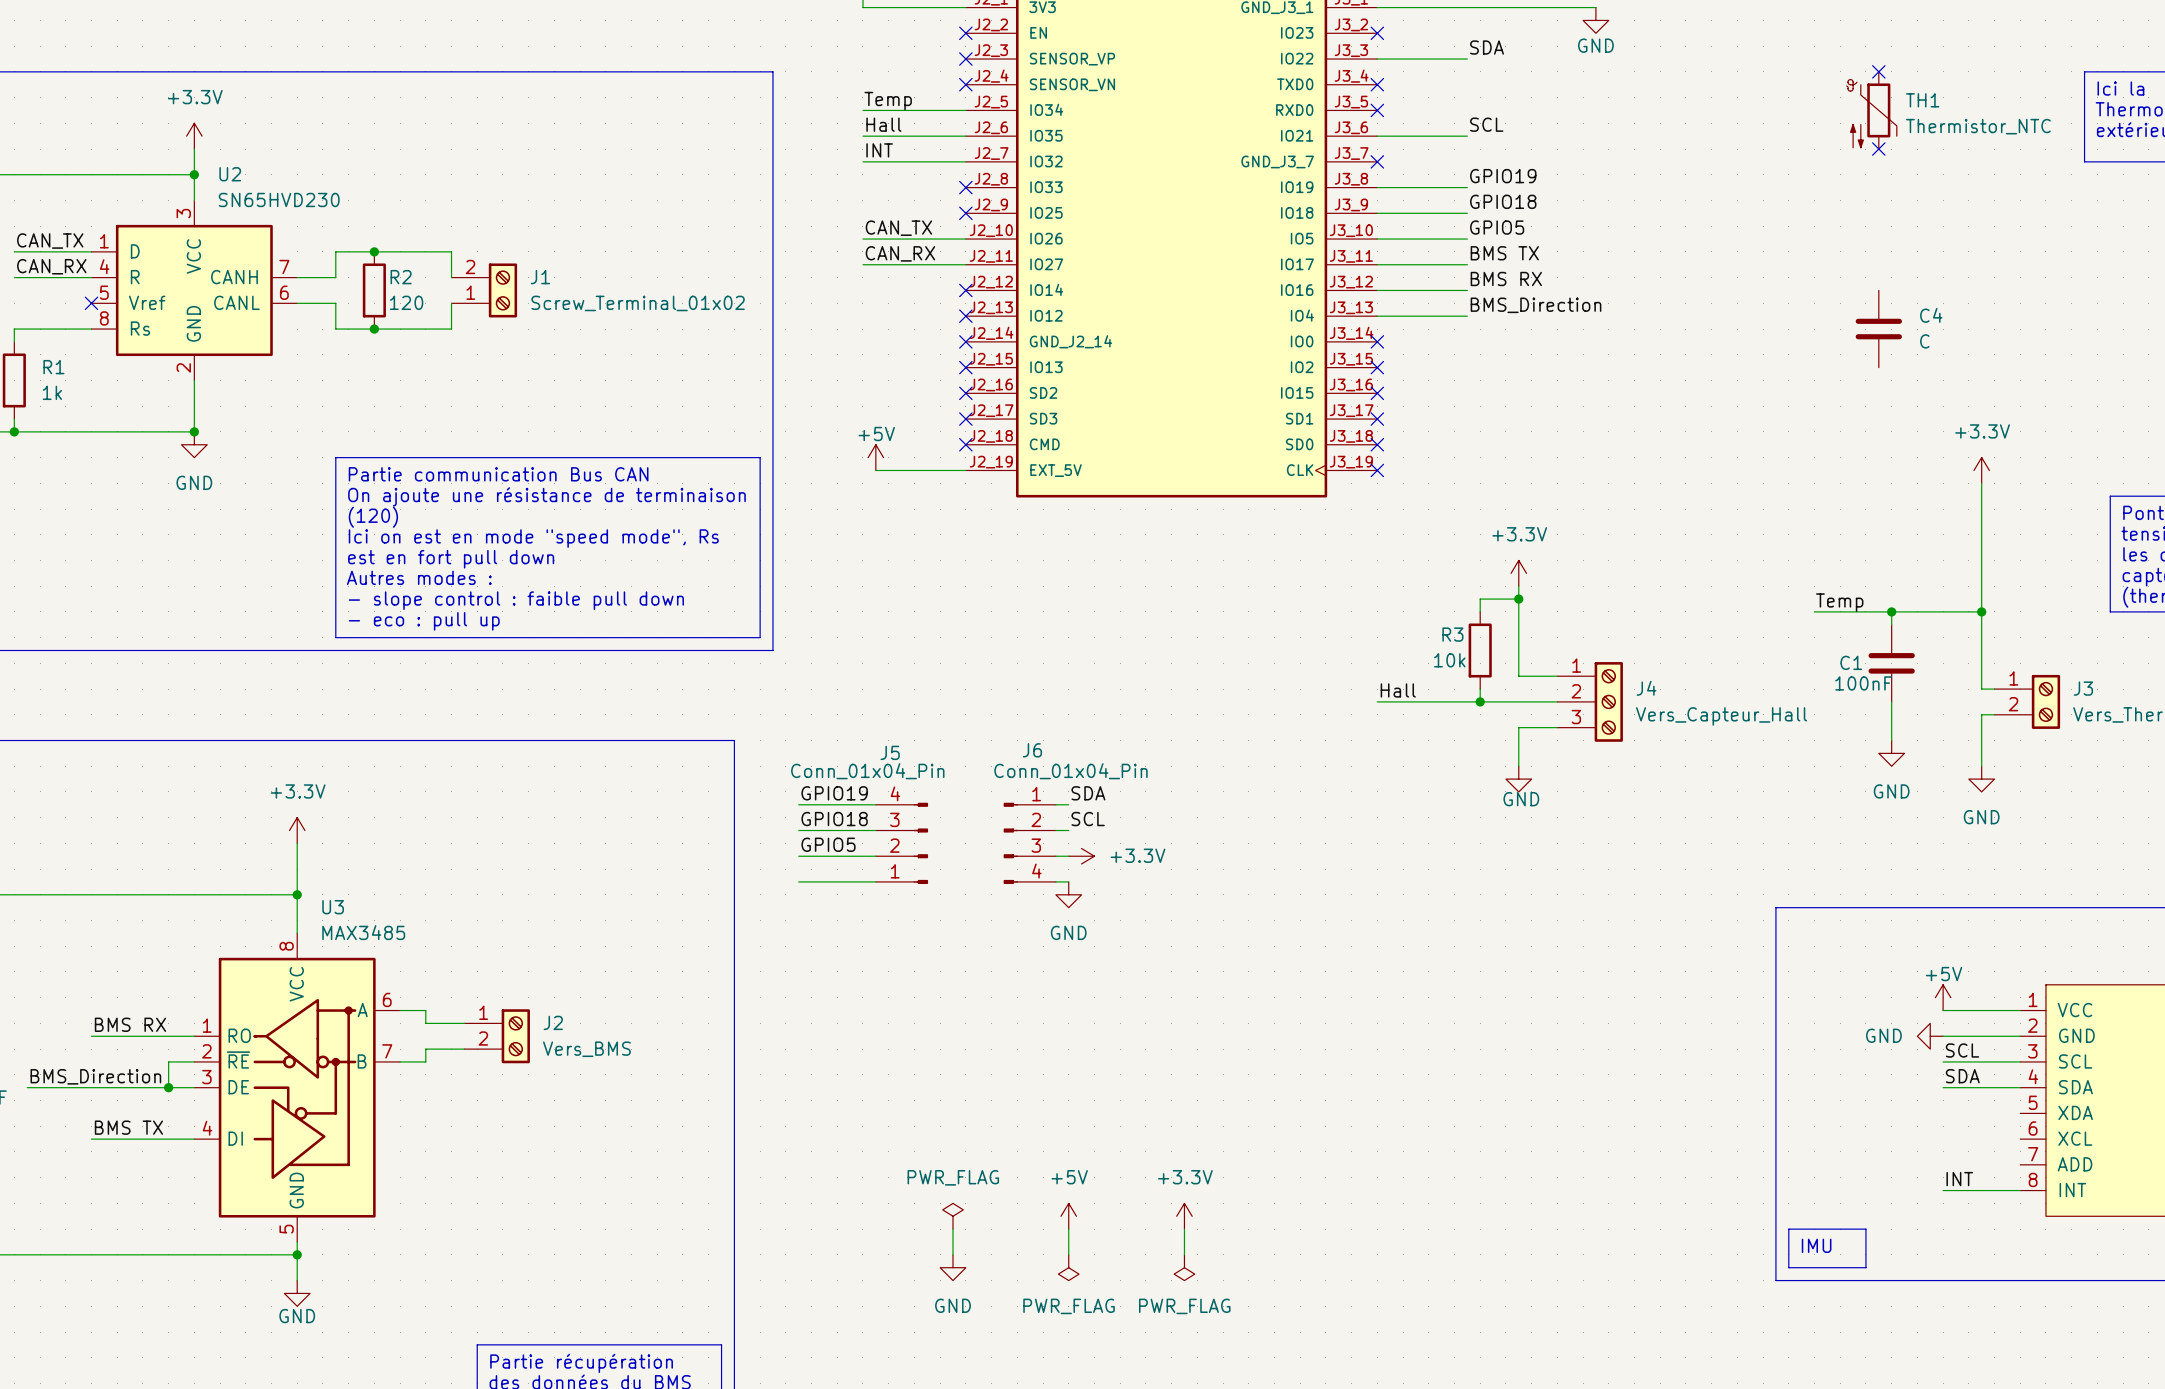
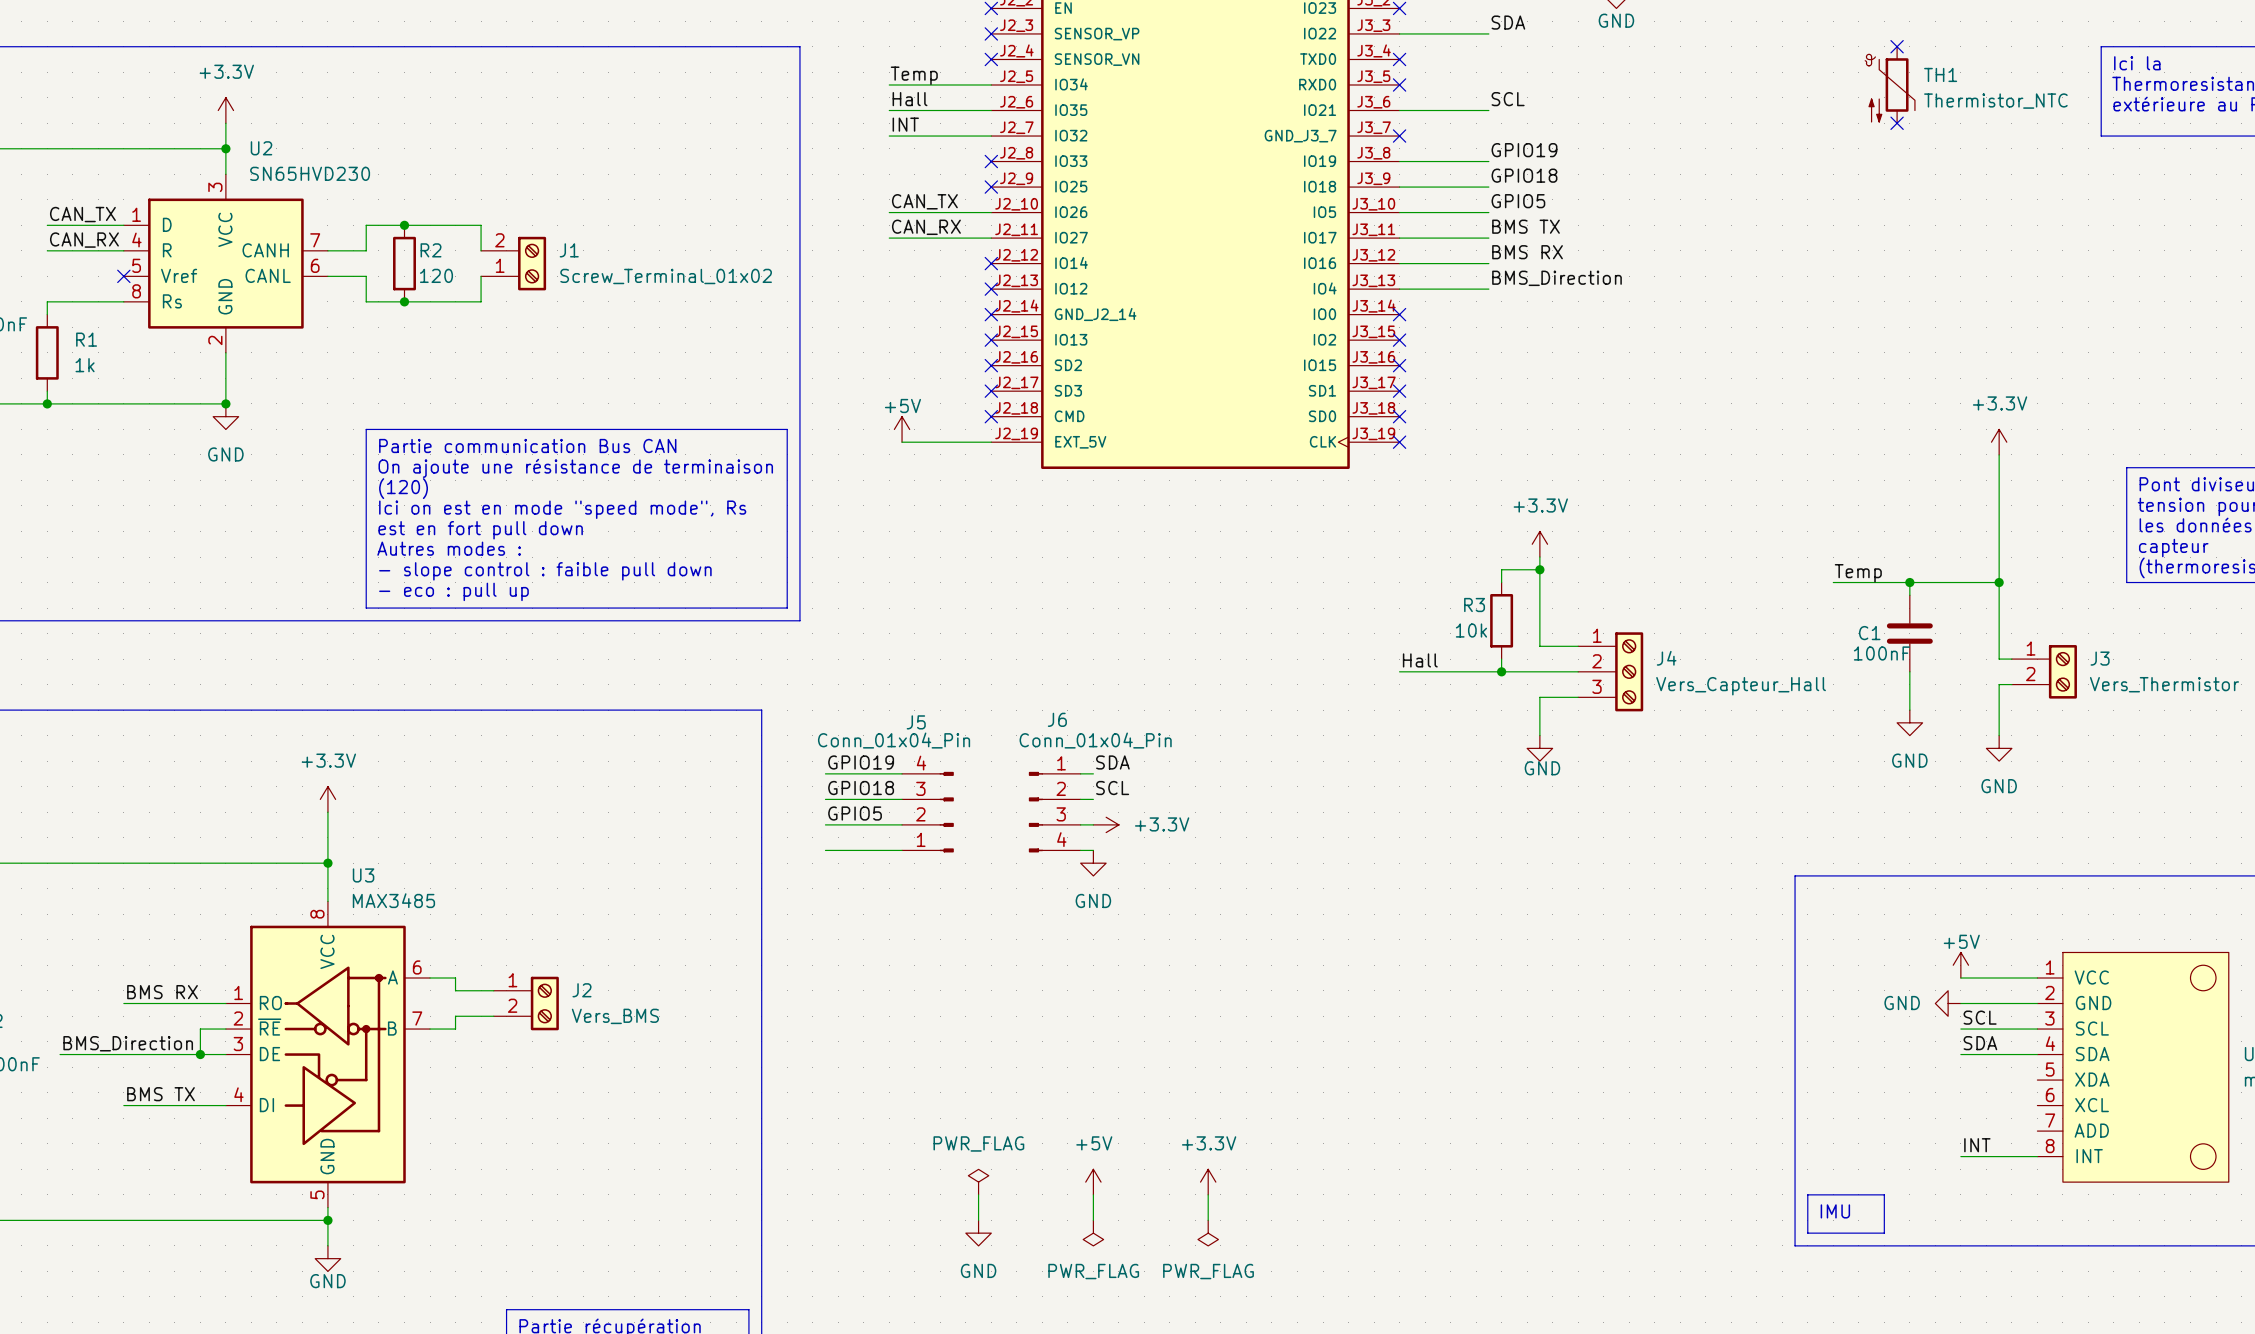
C4: C (1878, 329) -> none

